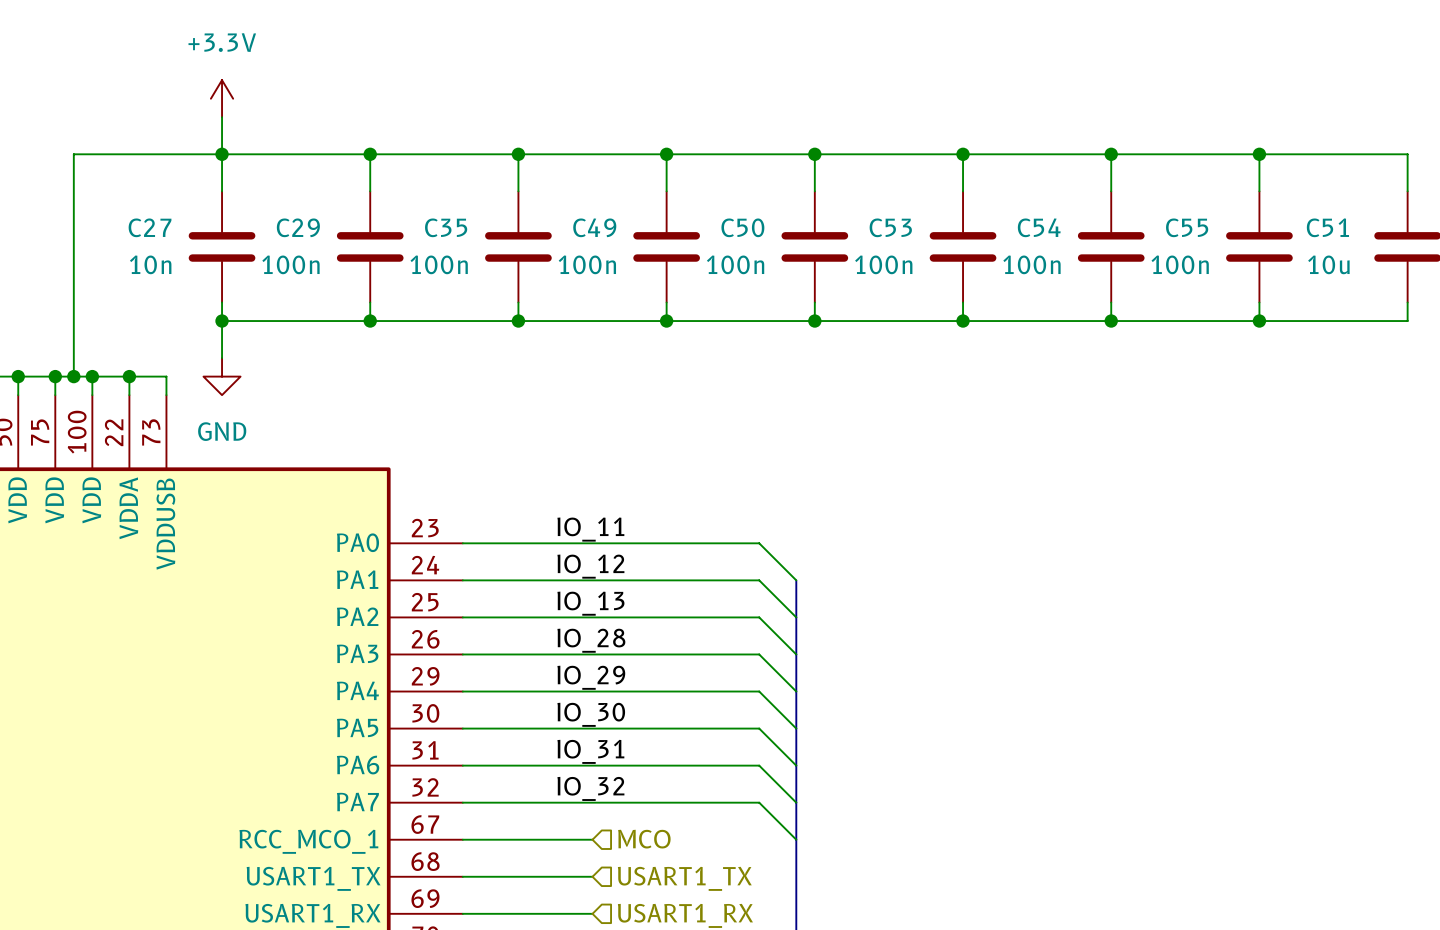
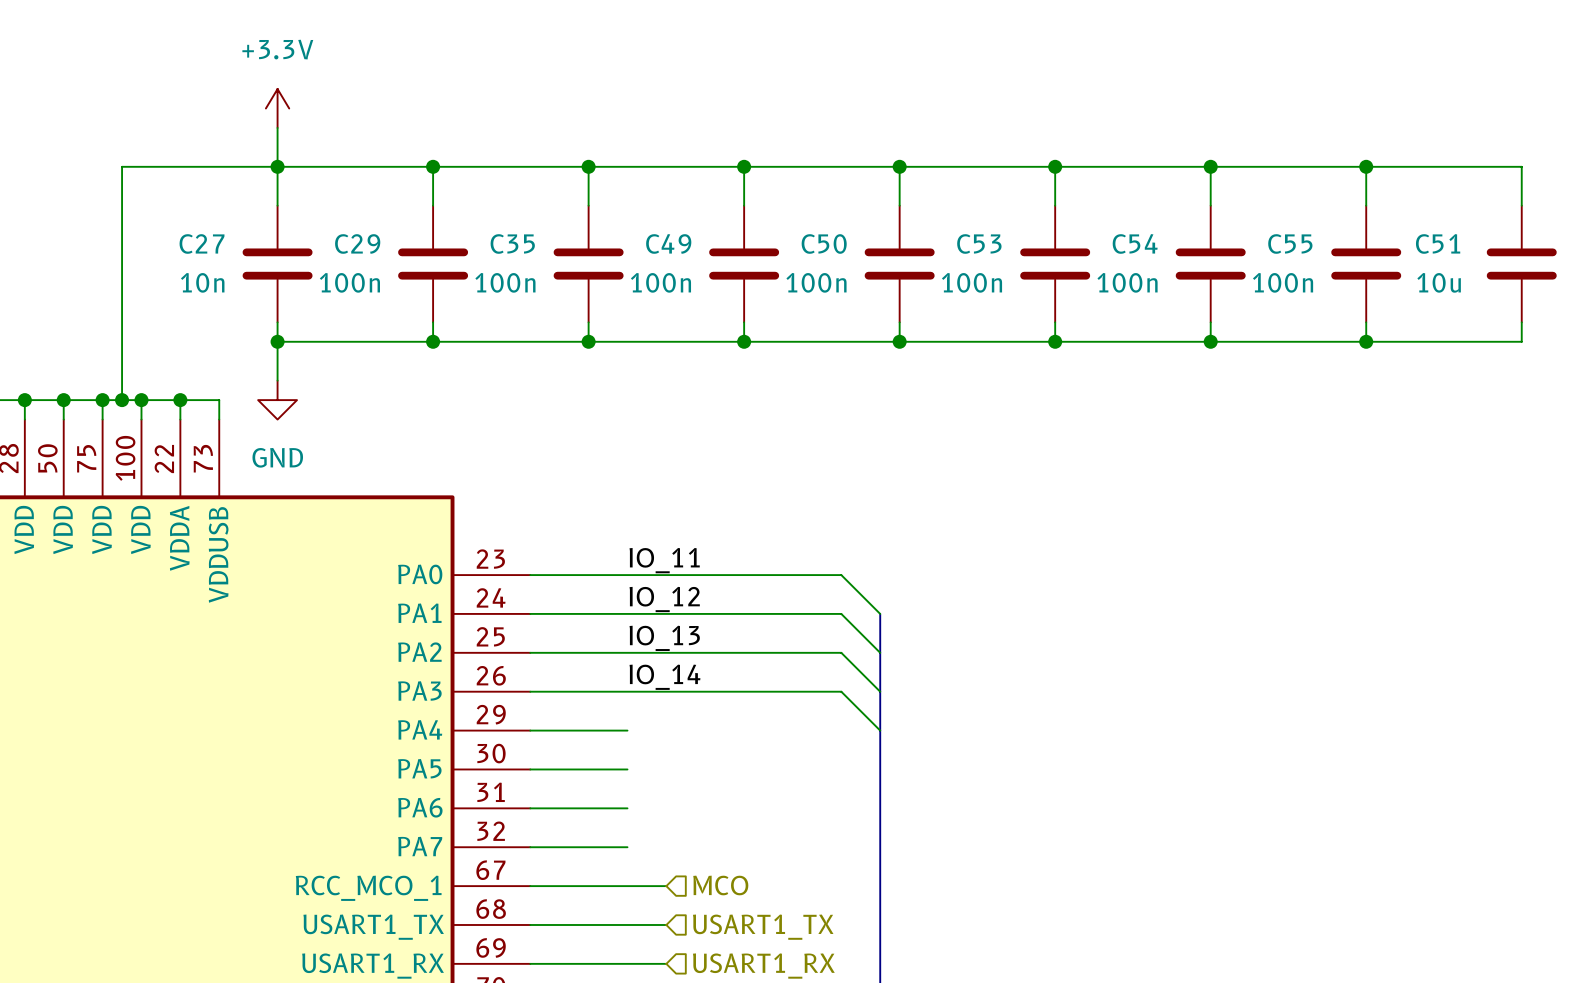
label: IO_28 (591, 640) -> IO_14 (664, 677)
label: IO_29 (591, 677) -> none
wire: (555, 691) (759, 691) (796, 728) -> none
label: IO_30 (591, 714) -> none
wire: (555, 728) (759, 728) (796, 765) -> none
label: IO_31 (590, 751) -> none
wire: (555, 765) (759, 765) (796, 802) -> none
label: IO_32 (590, 788) -> none
wire: (555, 802) (759, 802) (796, 839) -> none

